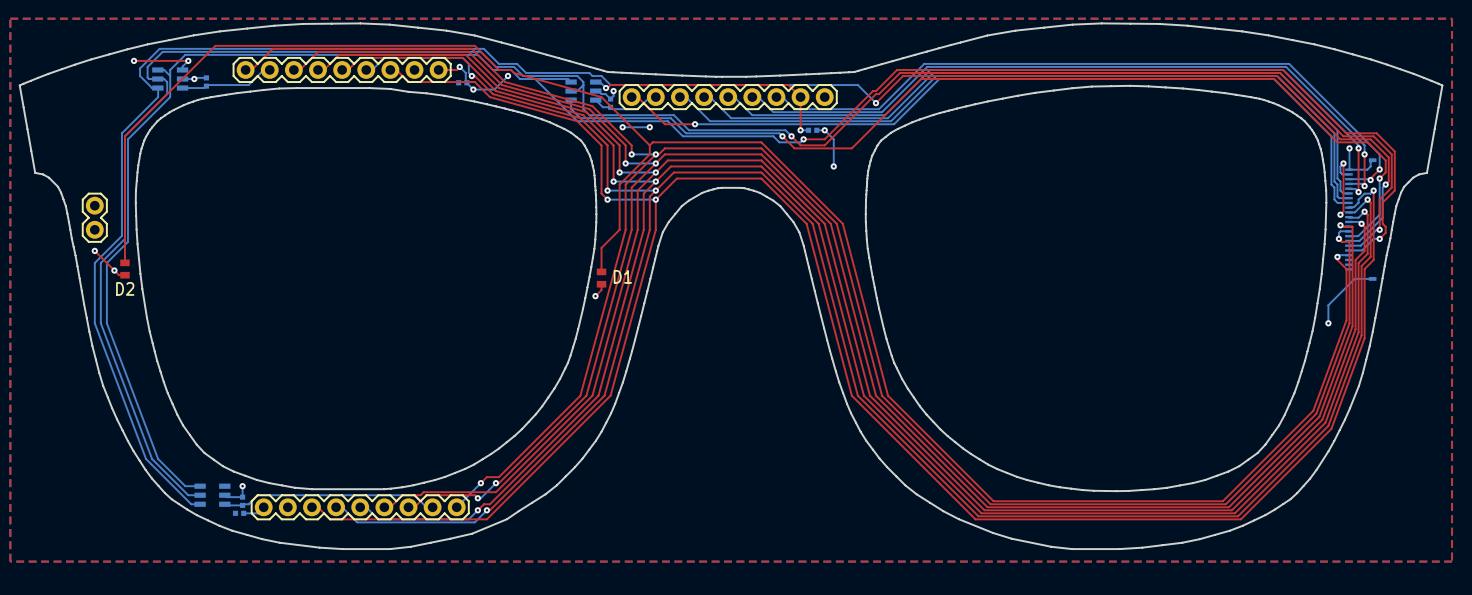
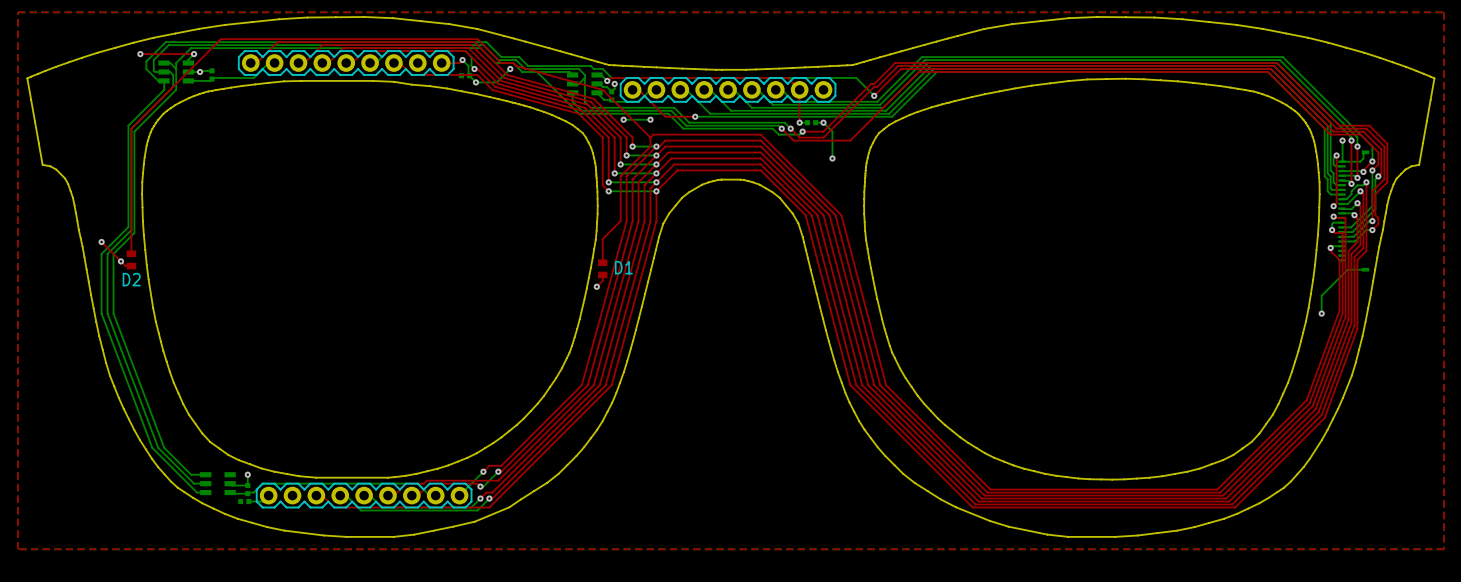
part: (94, 217) -> none

